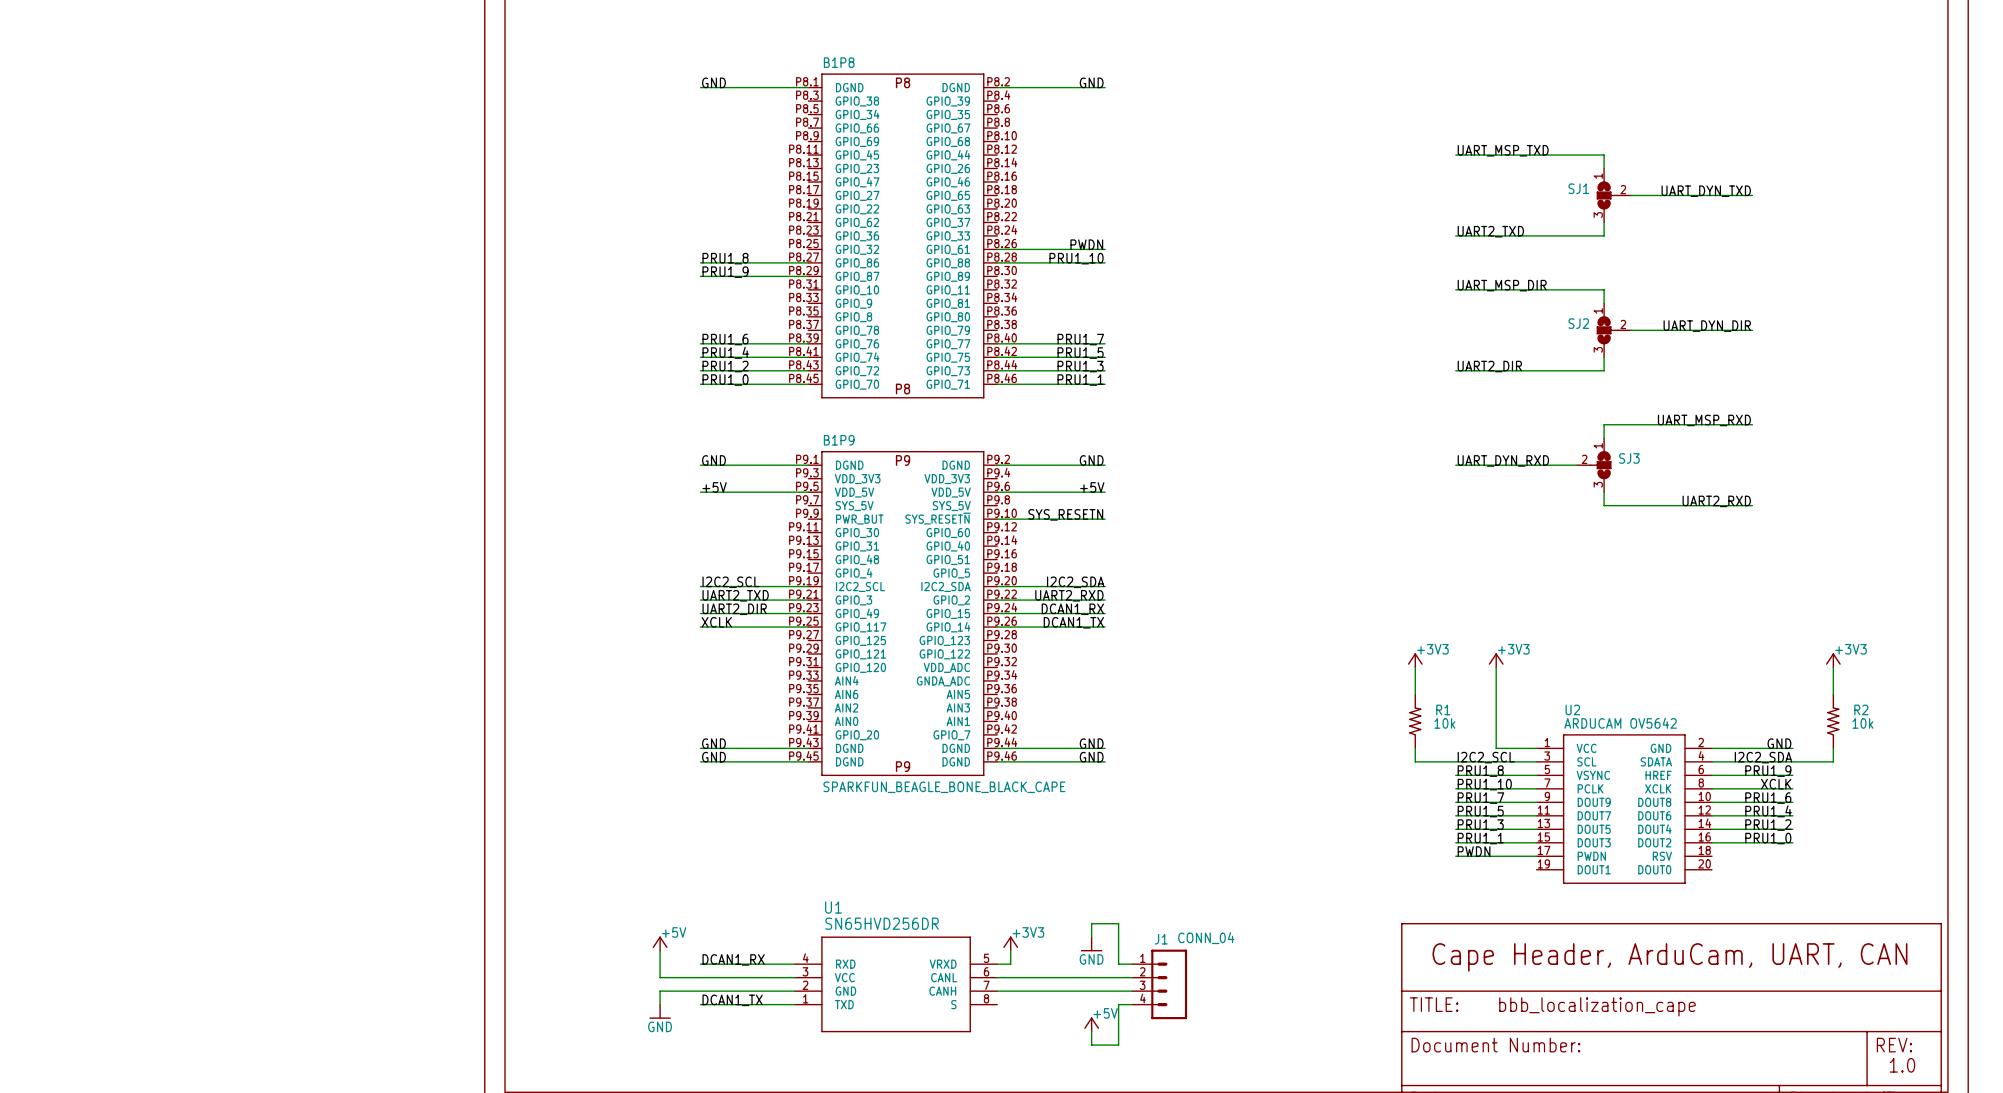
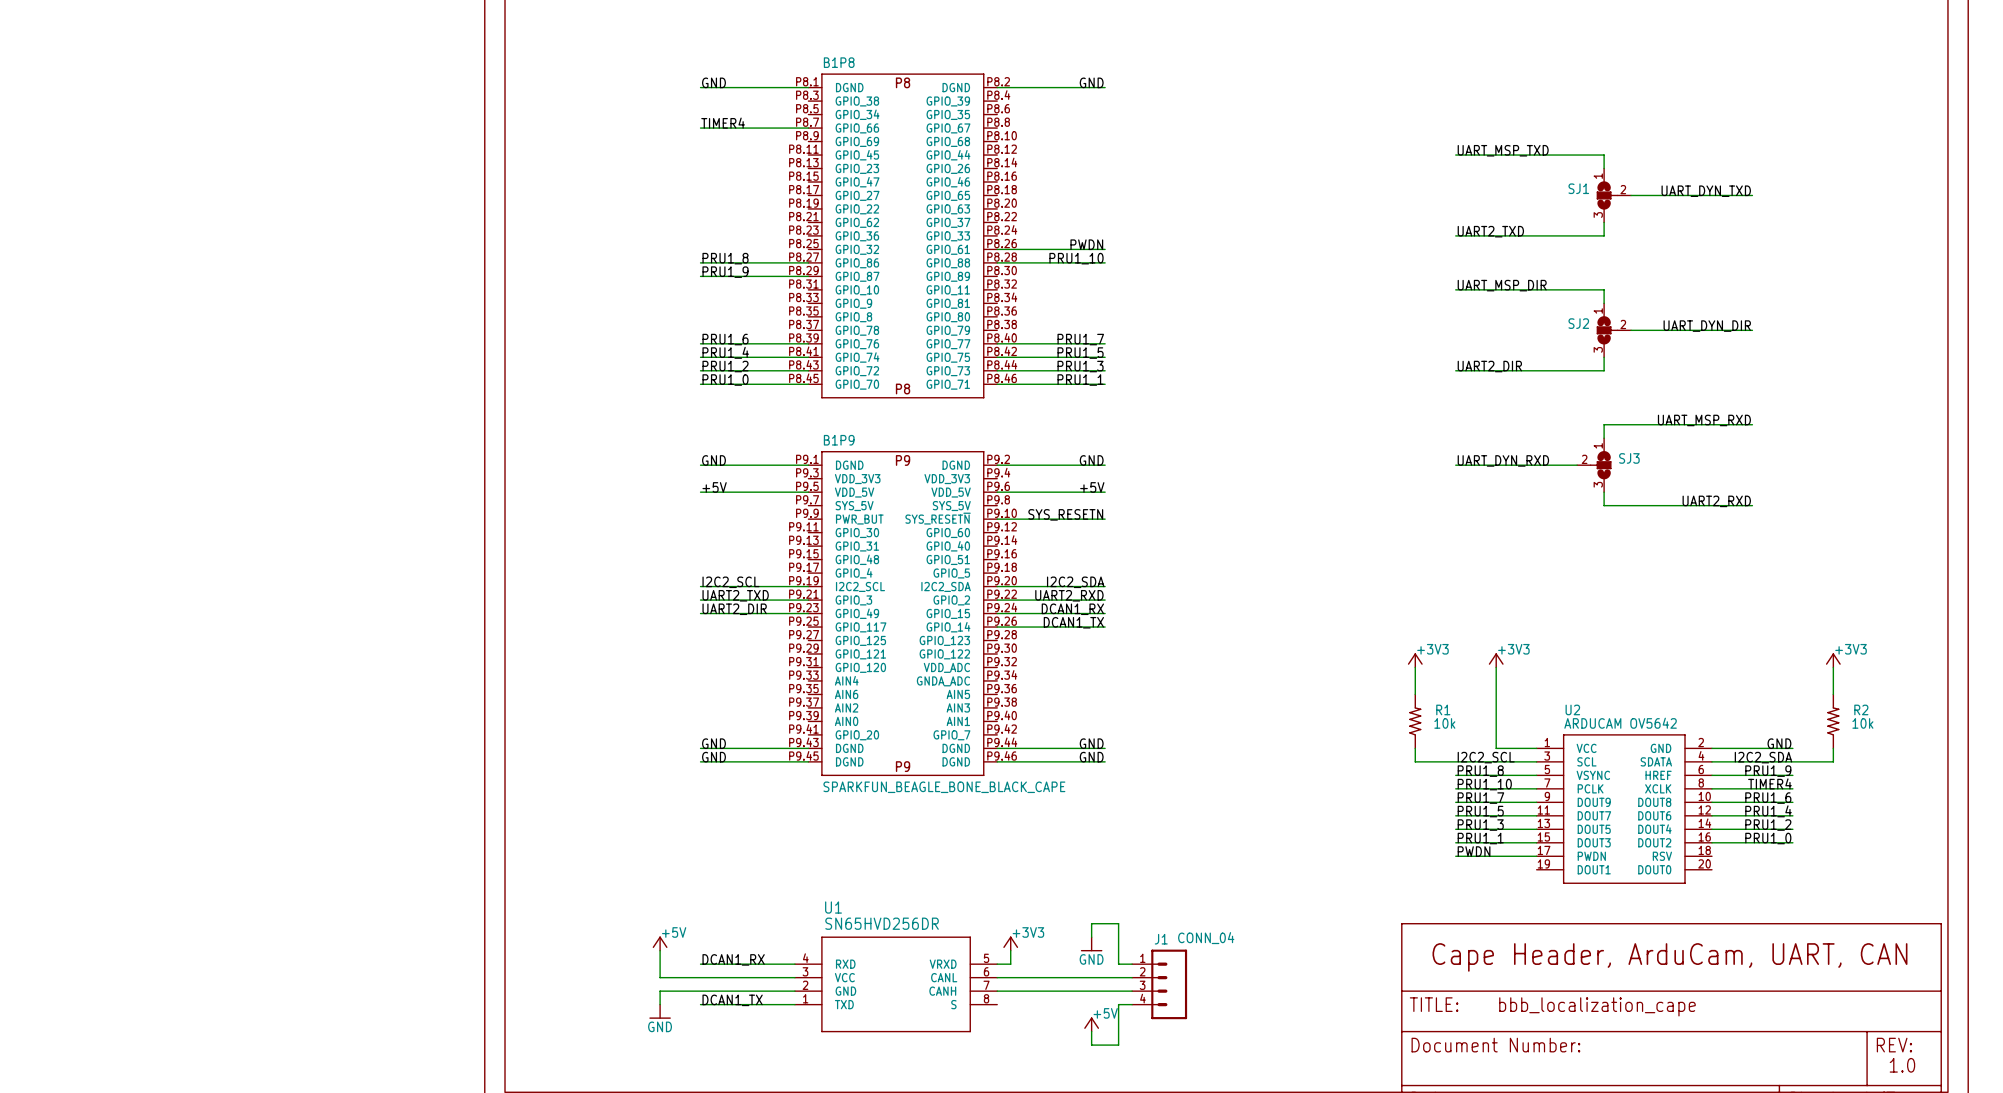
label: none -> TIMER4 (723, 123)
wire: none -> (700, 128) (808, 128)
label: XCLK (716, 622) -> none
wire: (700, 627) (808, 627) -> none
label: XCLK (1776, 784) -> TIMER4 (1769, 783)

